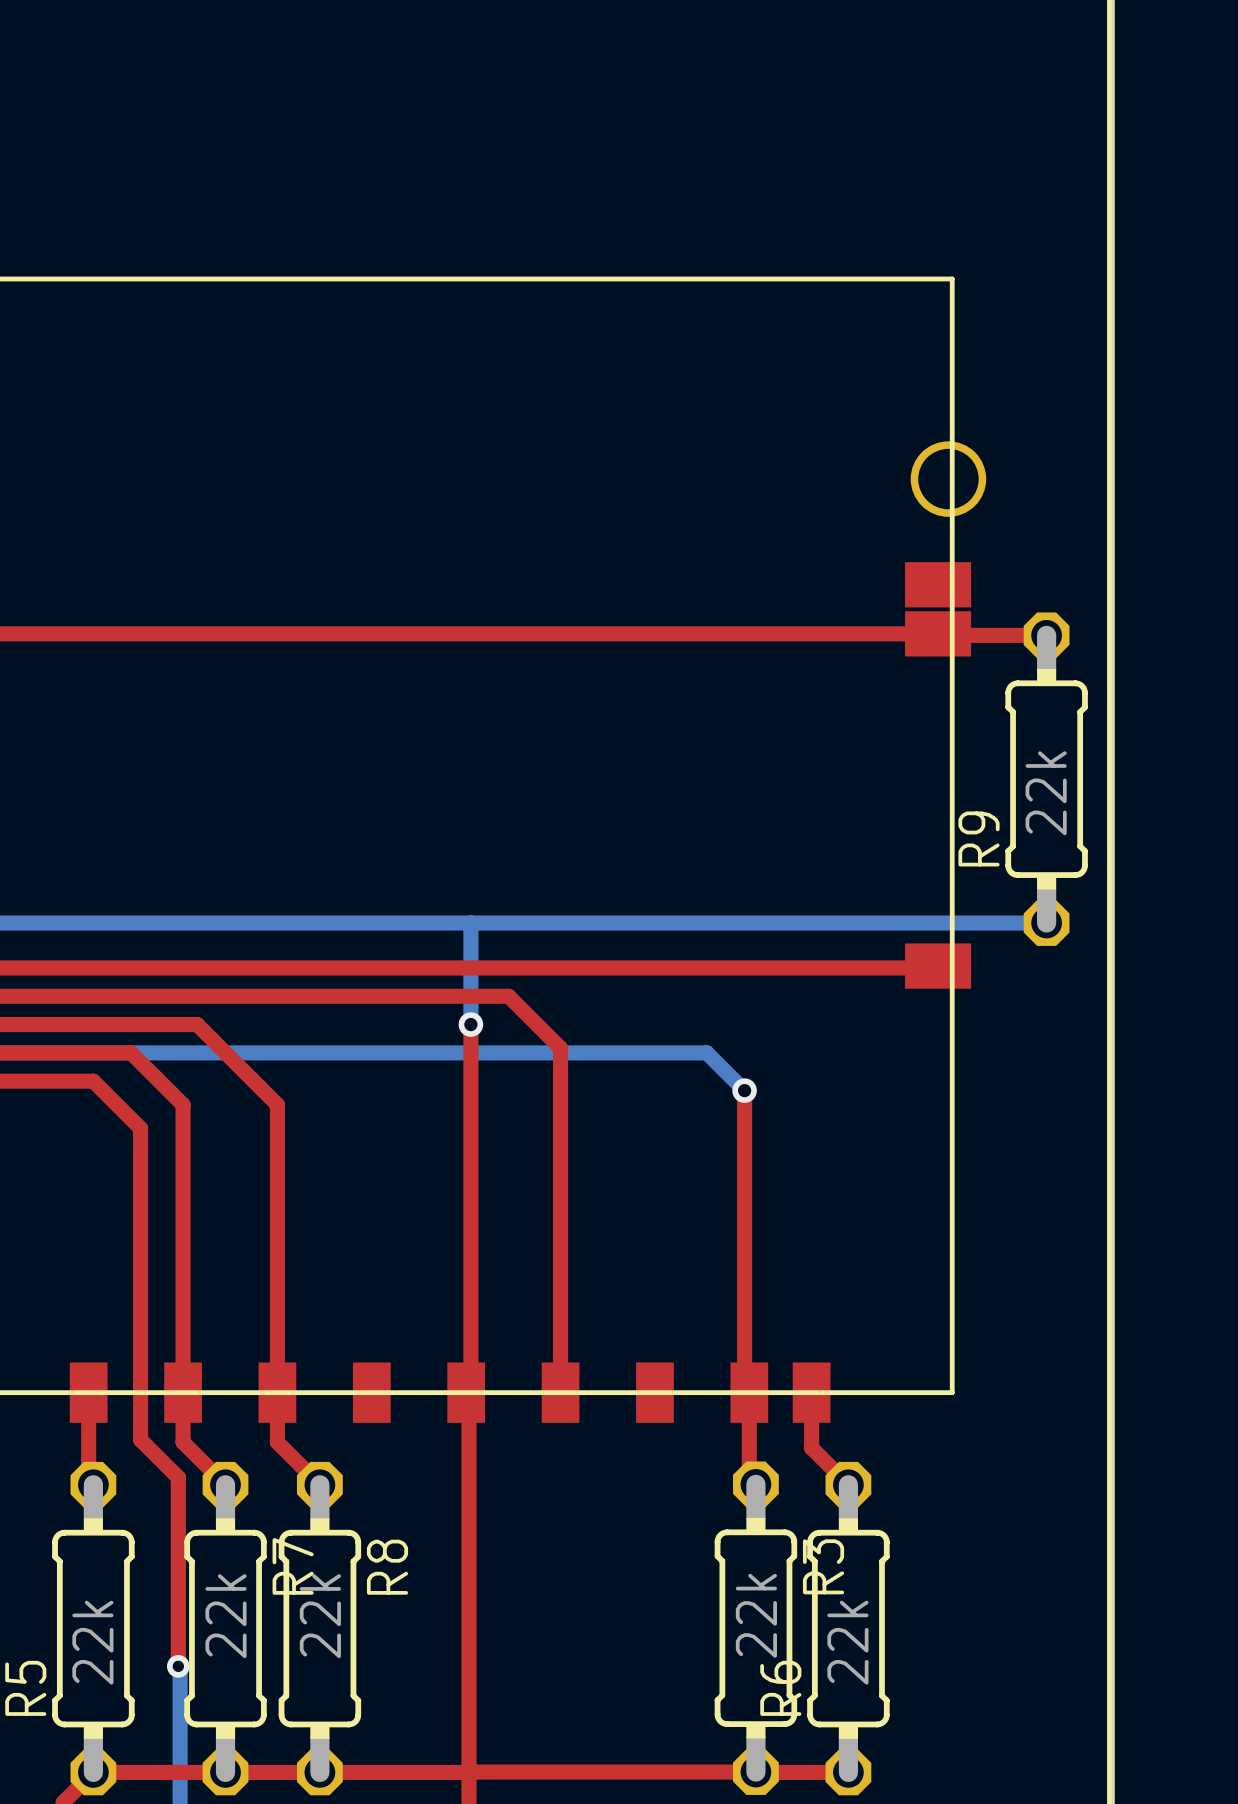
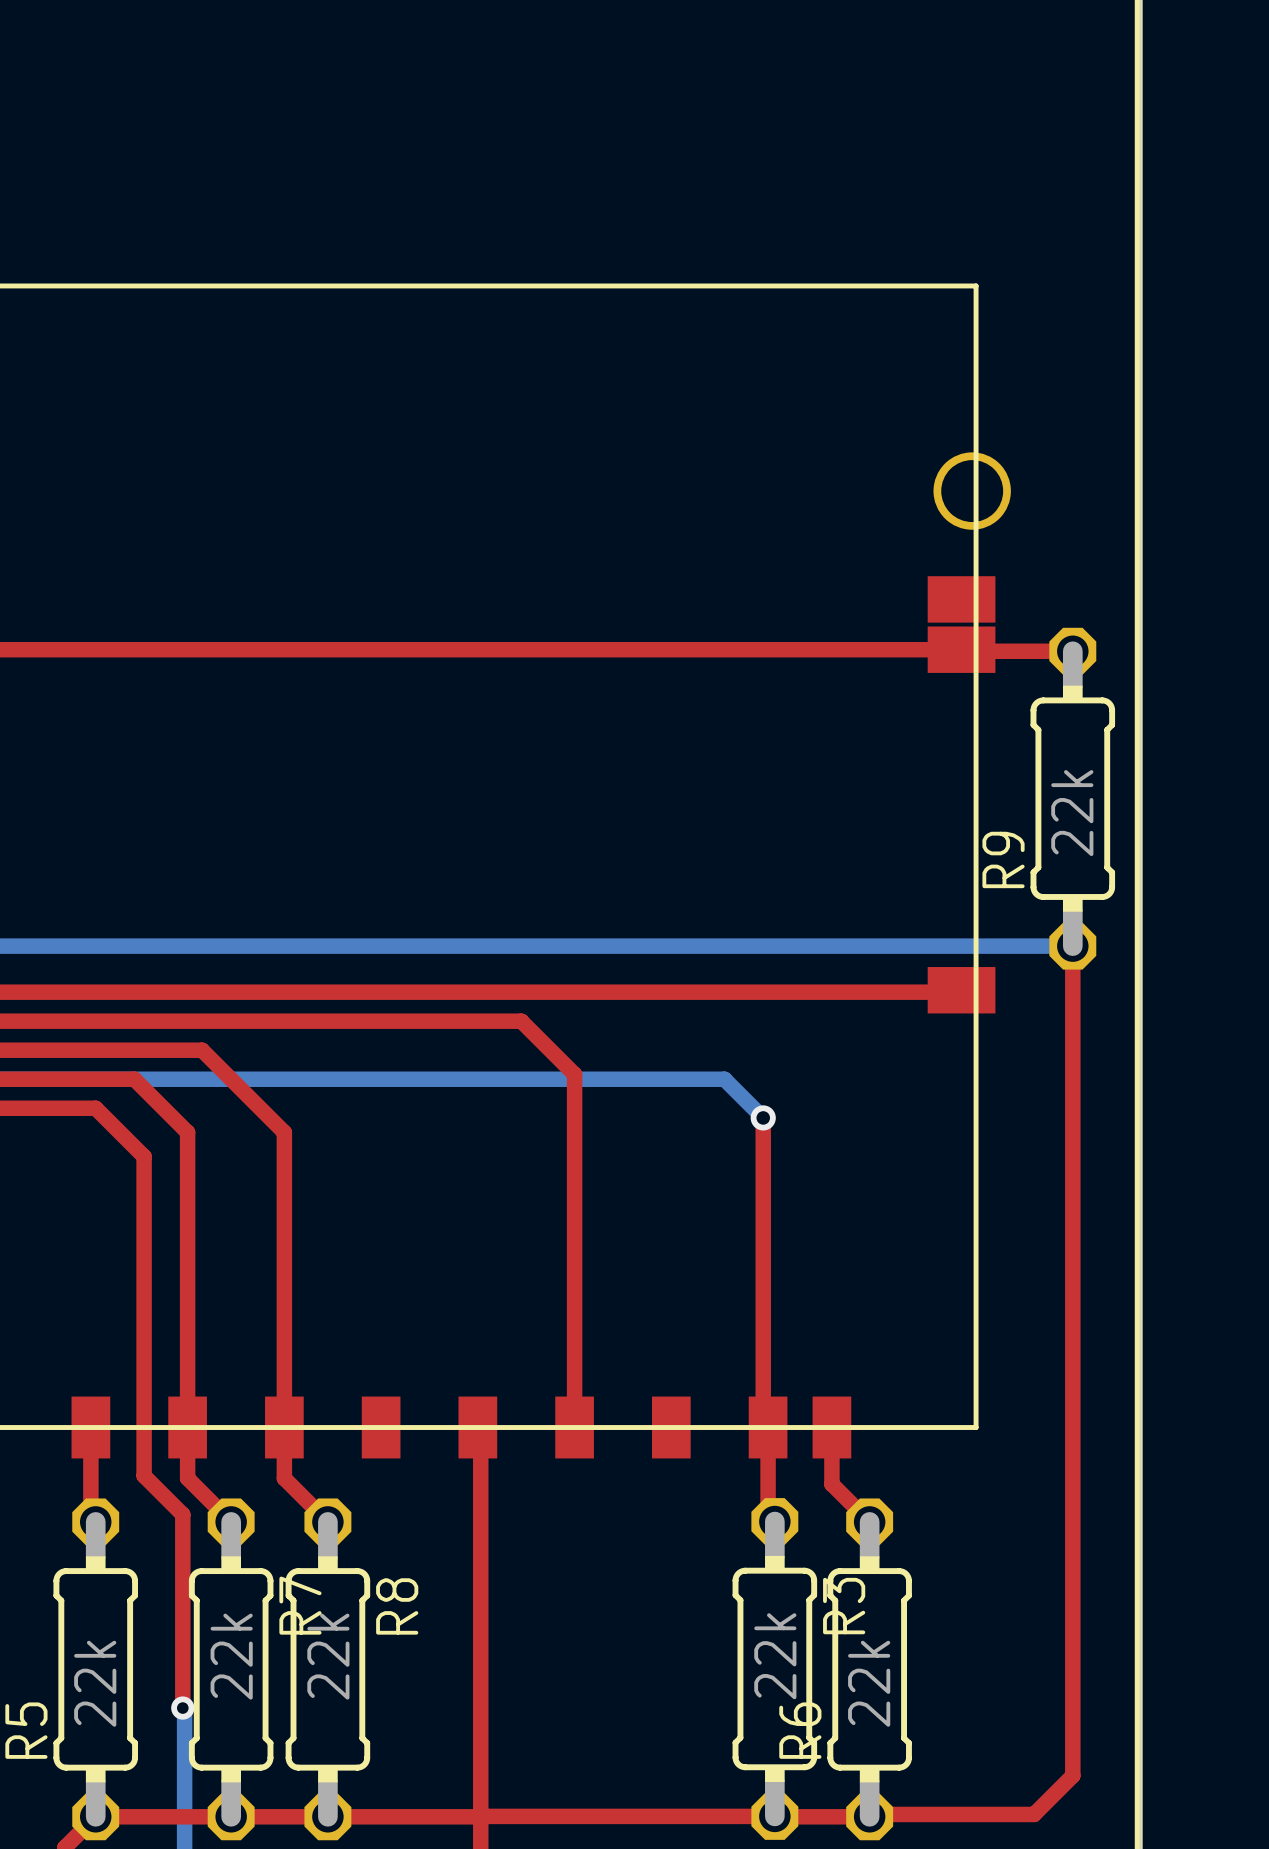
bottom track: (470, 923) (470, 1024) -> none
top track: none -> (1072, 946) (1072, 1775) (1034, 1814) (871, 1814) (869, 1816)
top track: (470, 1024) (470, 1387) -> none
via: (470, 1024) -> none

